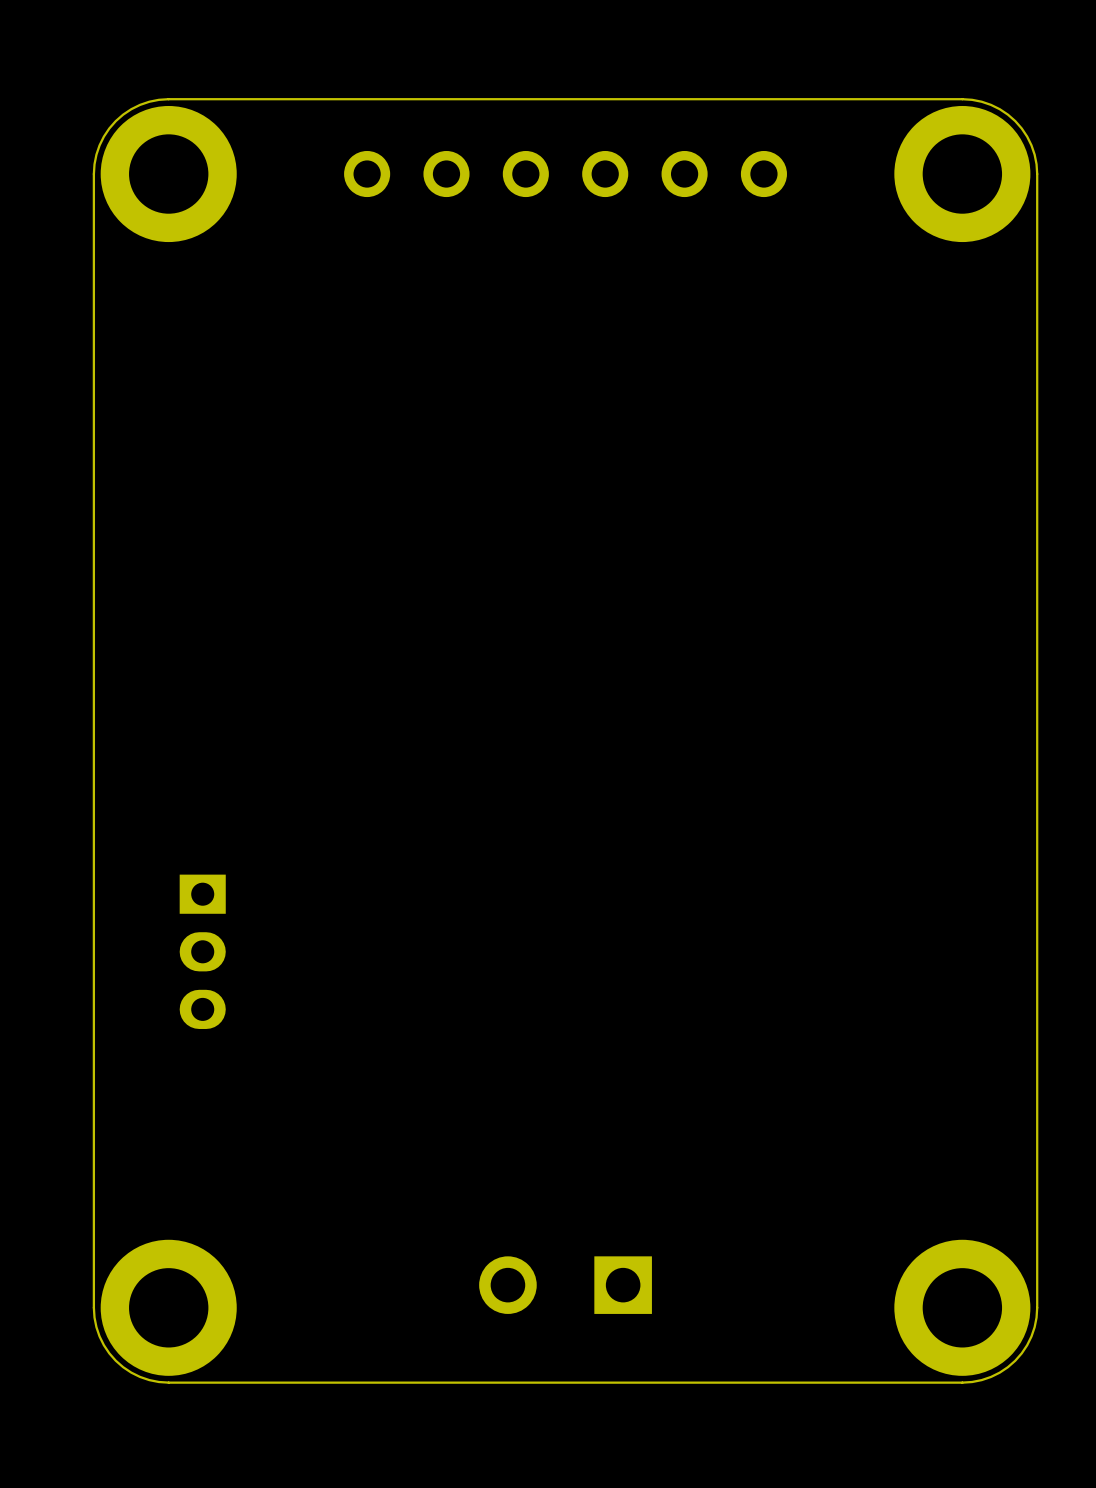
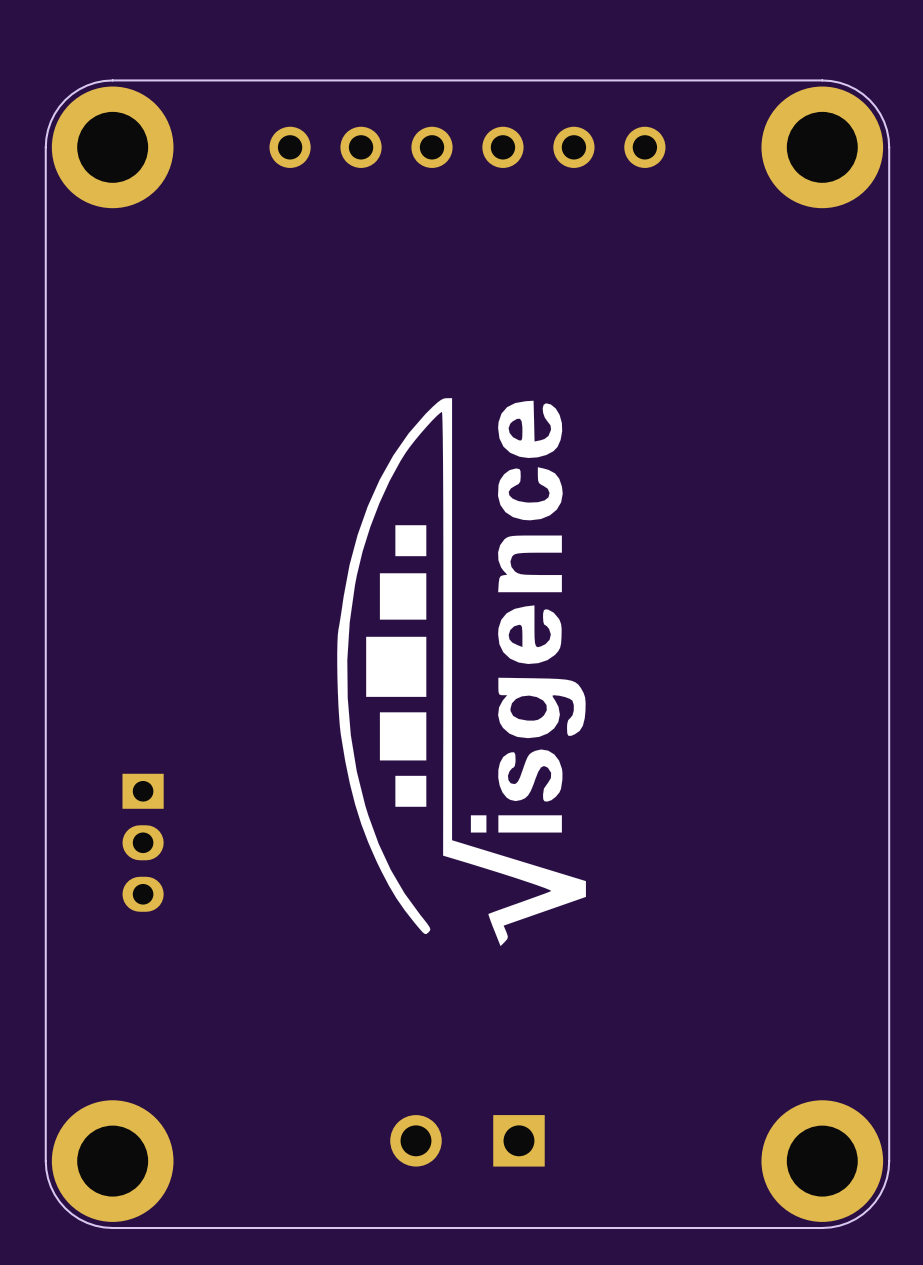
drawing: none -> [337, 398, 586, 947]

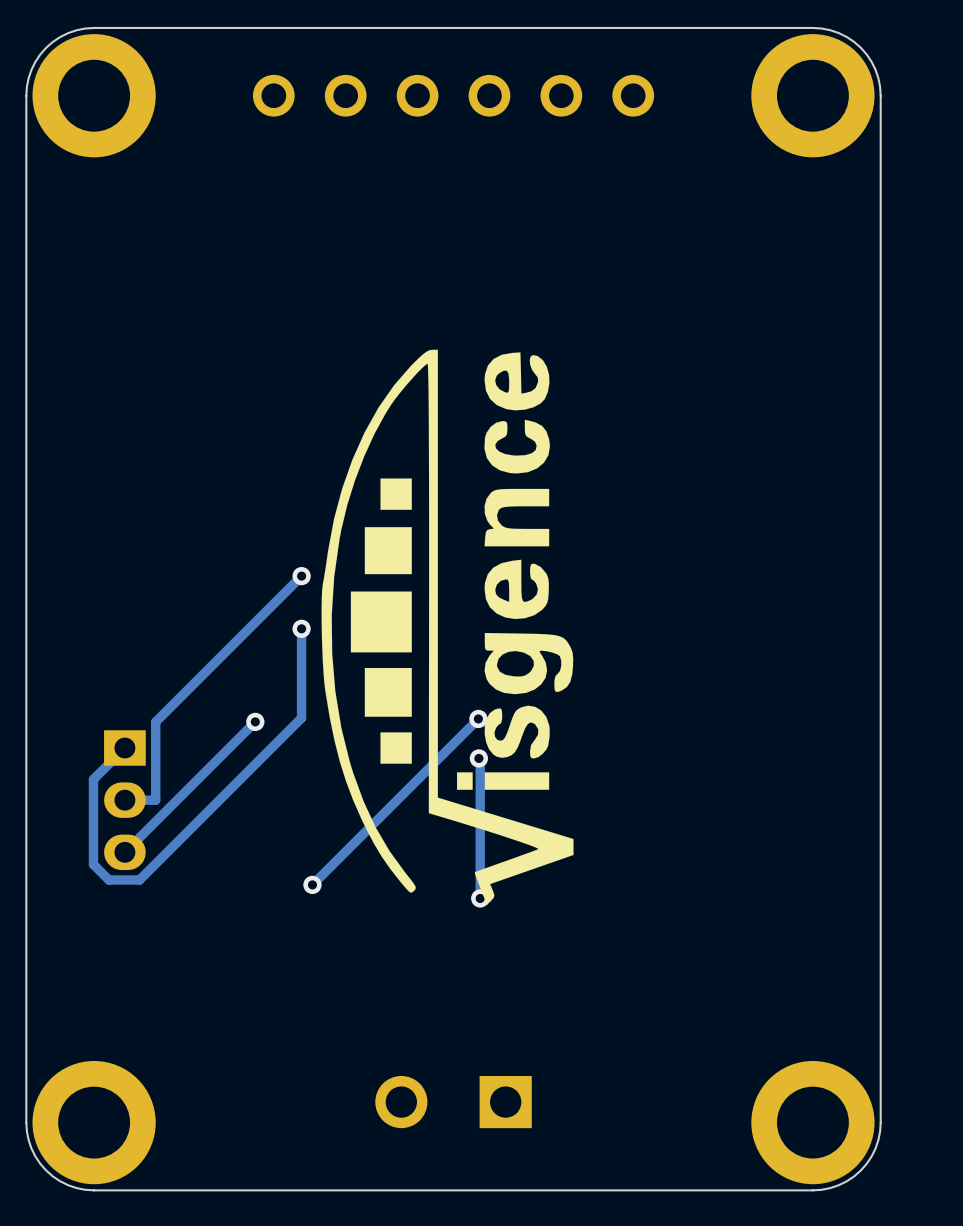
track: none -> (301, 576) (155, 722) (155, 800) (124, 800)
via: none -> (301, 576)
track: none -> (301, 628) (301, 718) (139, 879) (108, 879) (93, 864) (93, 779) (124, 747)
via: none -> (301, 628)
track: none -> (478, 718) (312, 884)
via: none -> (478, 718)
track: none -> (255, 721) (124, 852)
via: none -> (255, 721)
track: none -> (478, 758) (480, 898)
via: none -> (478, 758)
via: none -> (312, 884)
via: none -> (480, 898)

